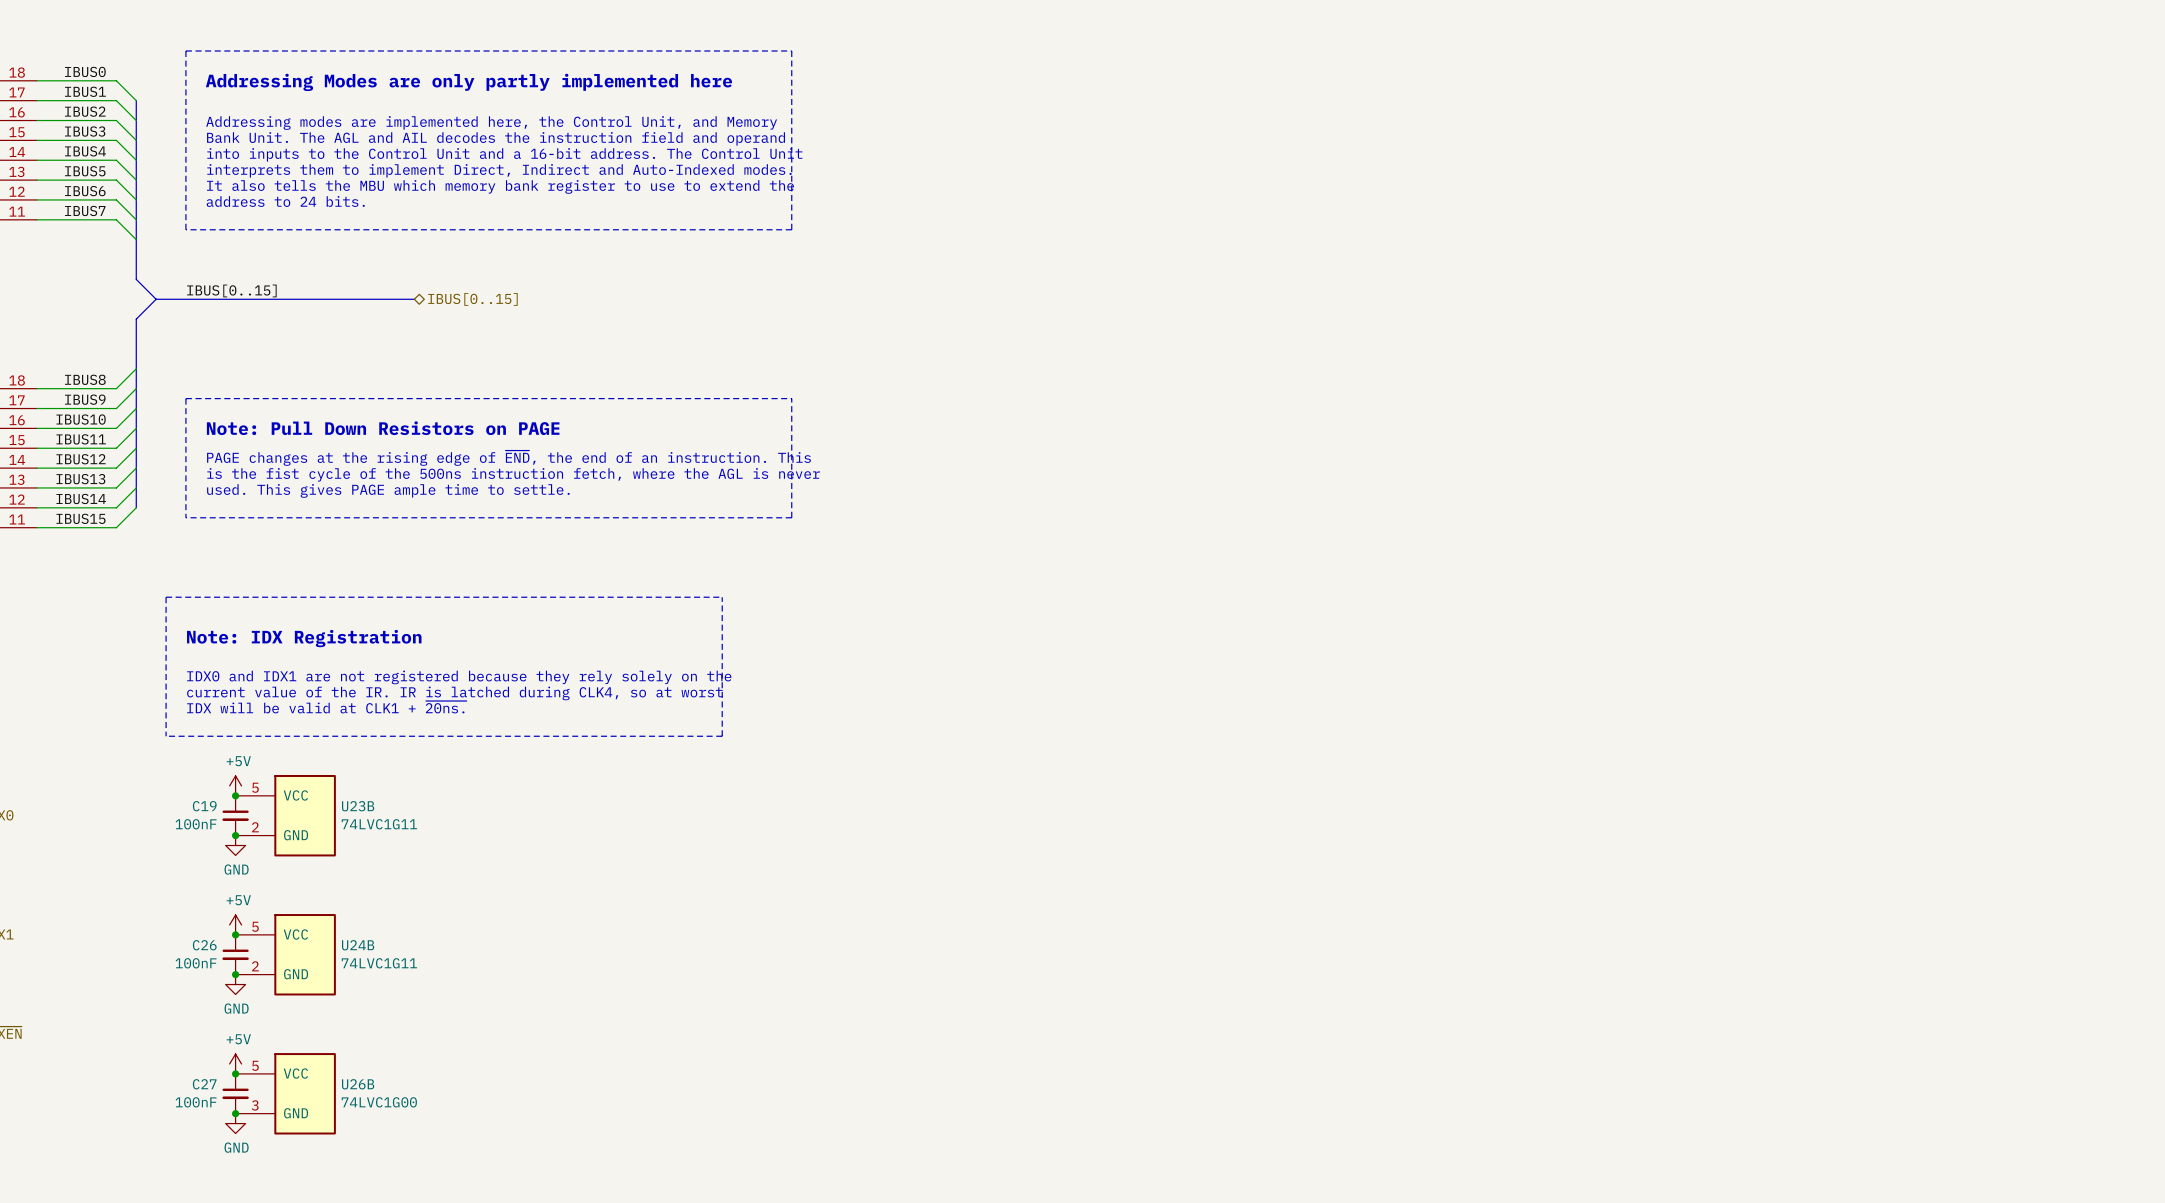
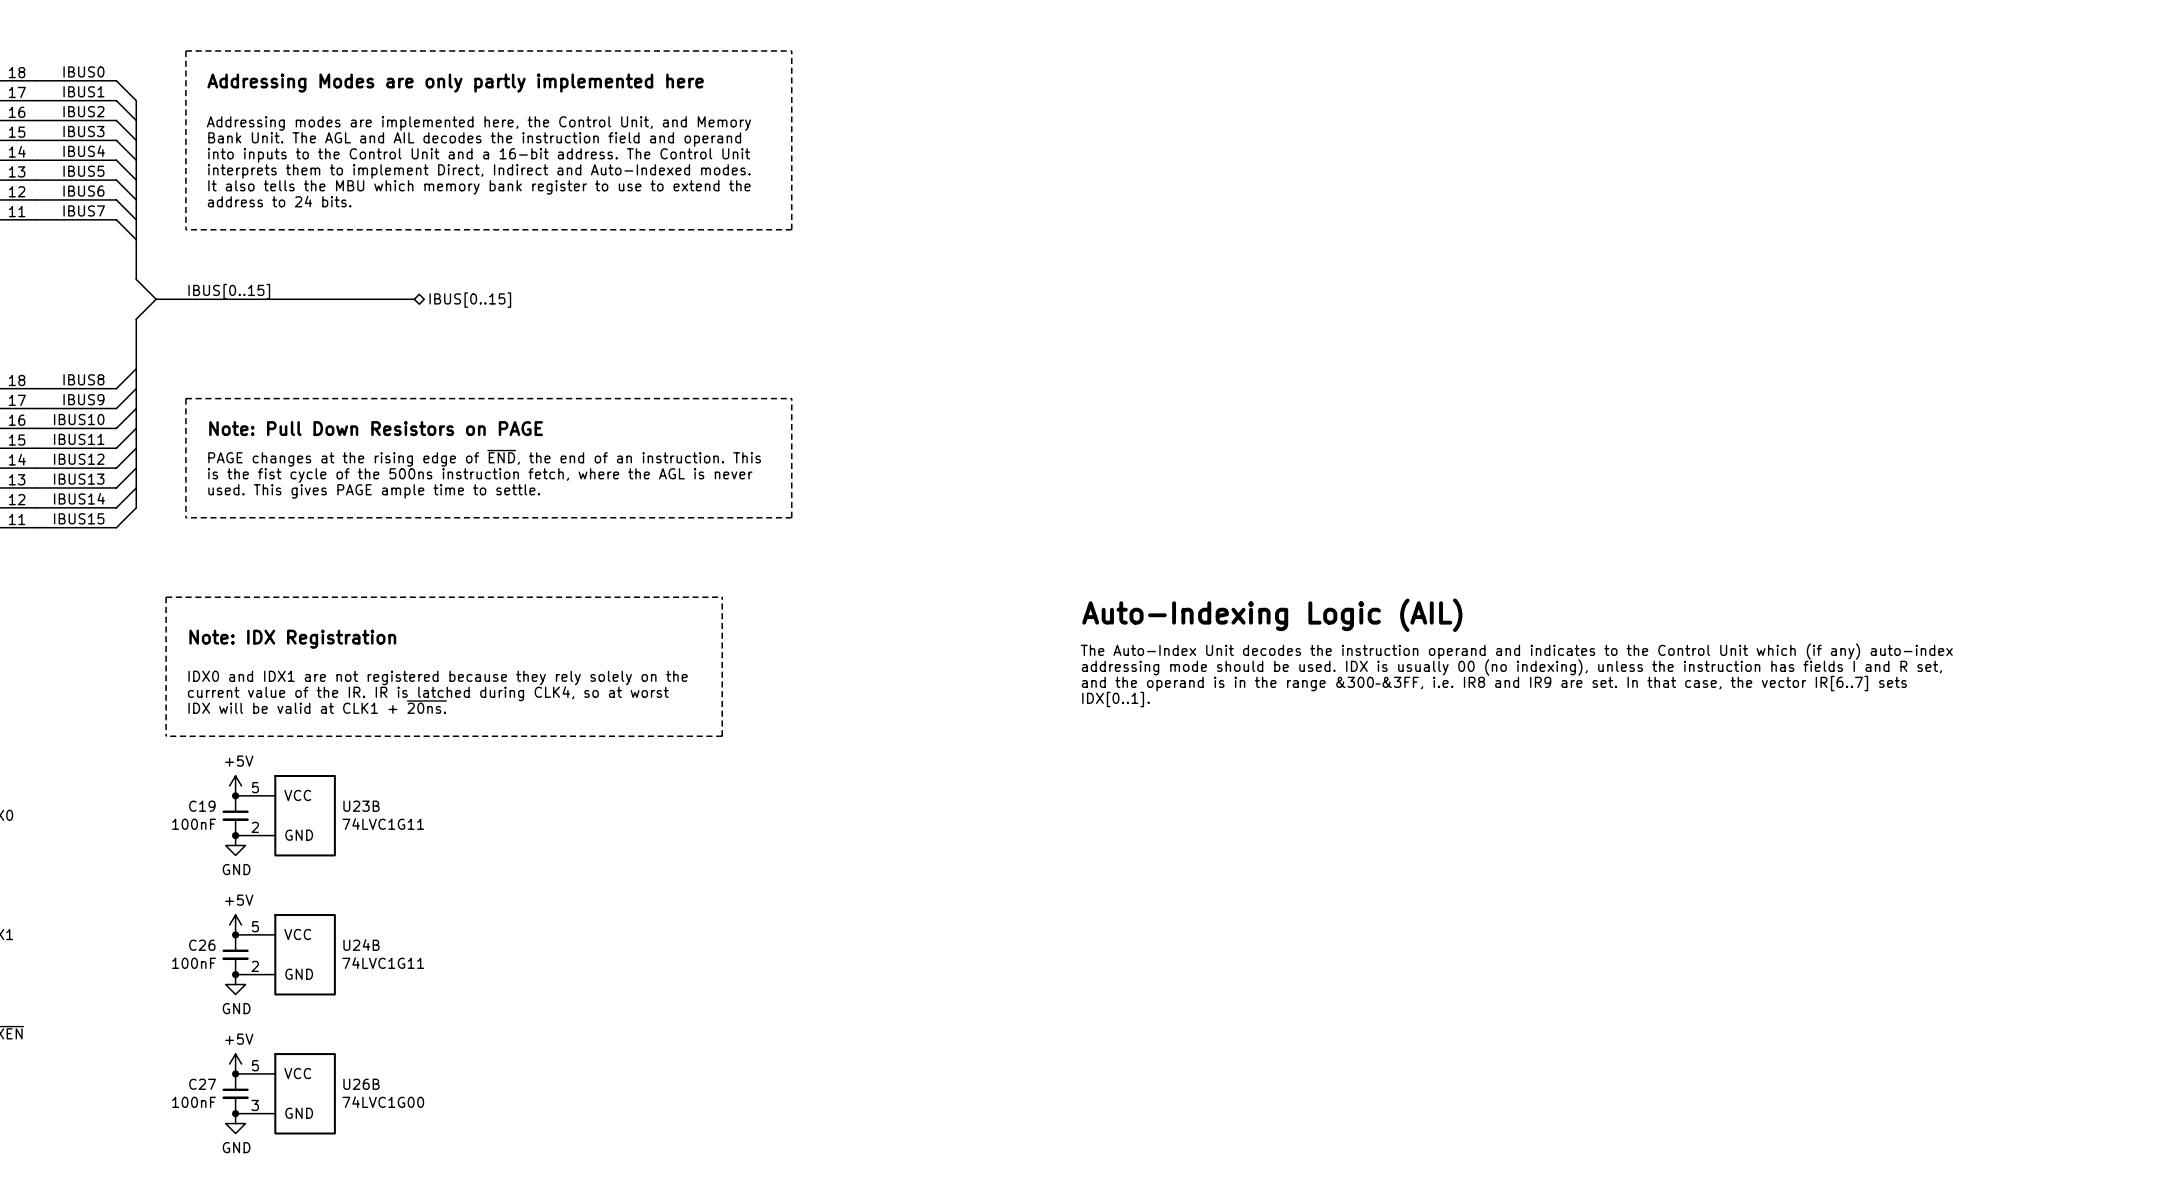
text: none -> Auto-Indexing Logic (AIL) (1272, 615)
text: none -> The Auto-Index Unit decodes the instruction operand and indicates to the Control Unit which (if any) auto-index (1516, 651)
text: none -> addressing mode should be used. IDX is usually 00 (no indexing), unless the instruction has fields I and R set, (1511, 667)
text: none -> and the operand is in the range &300–&3FF, i.e. IR8 and IR9 are set. In that case, the vector IR[6..7] sets (1494, 683)
text: none -> IDX[0..1]. (1116, 699)

